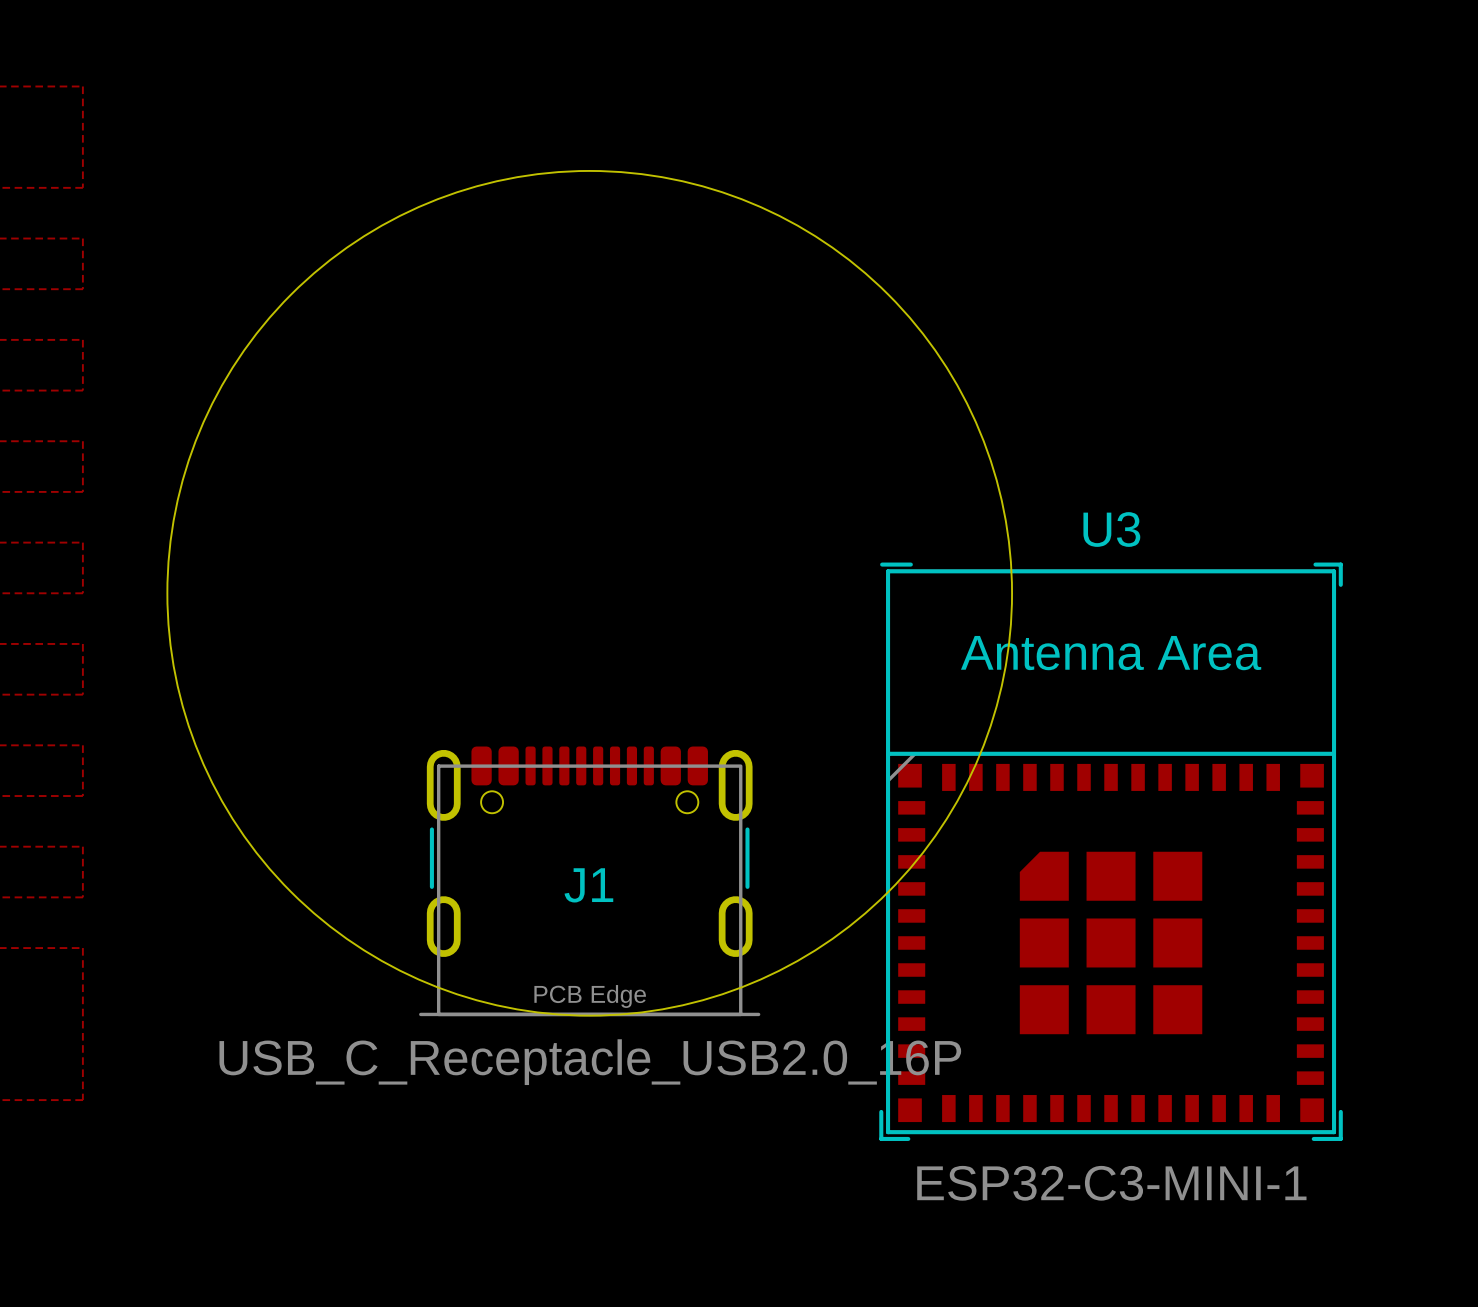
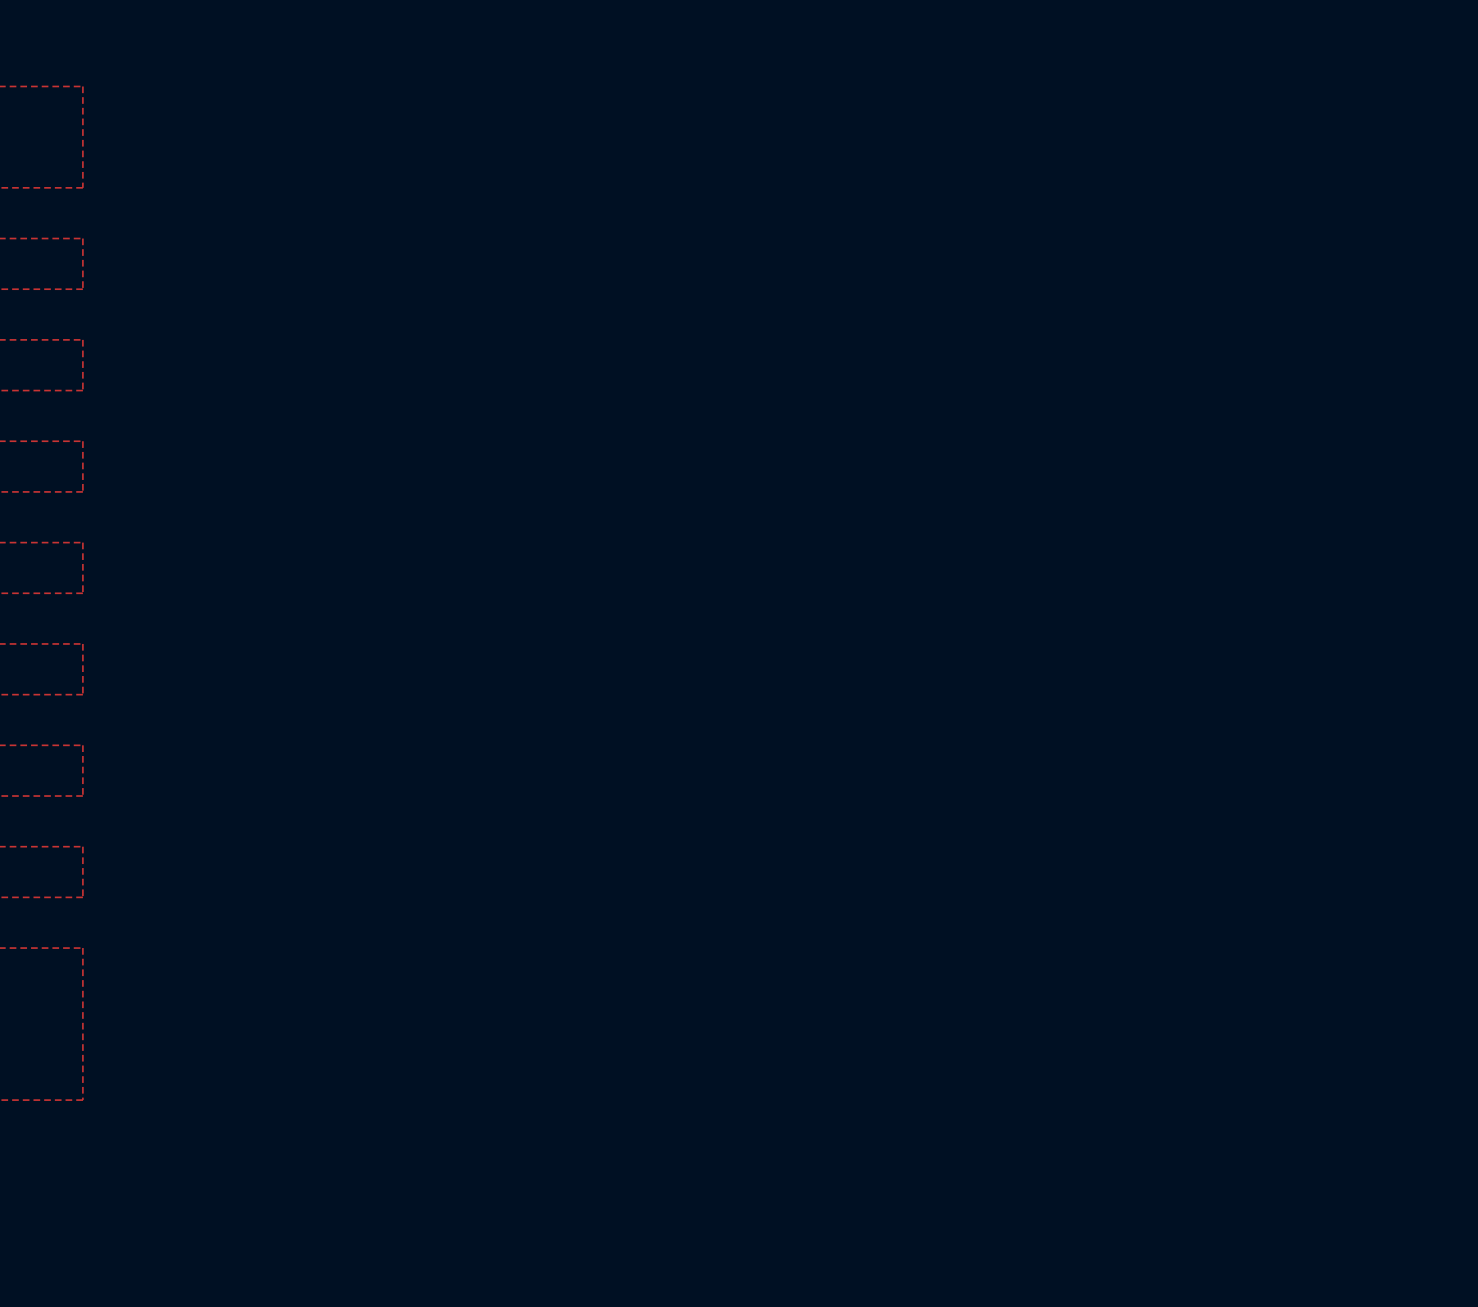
round board edge: [166, 170, 1013, 1017] -> none
U3: ESP32-C3-MINI-1 (1111, 851) -> none
J1: USB_C_Receptacle_USB2.0_16P (589, 881) -> none

